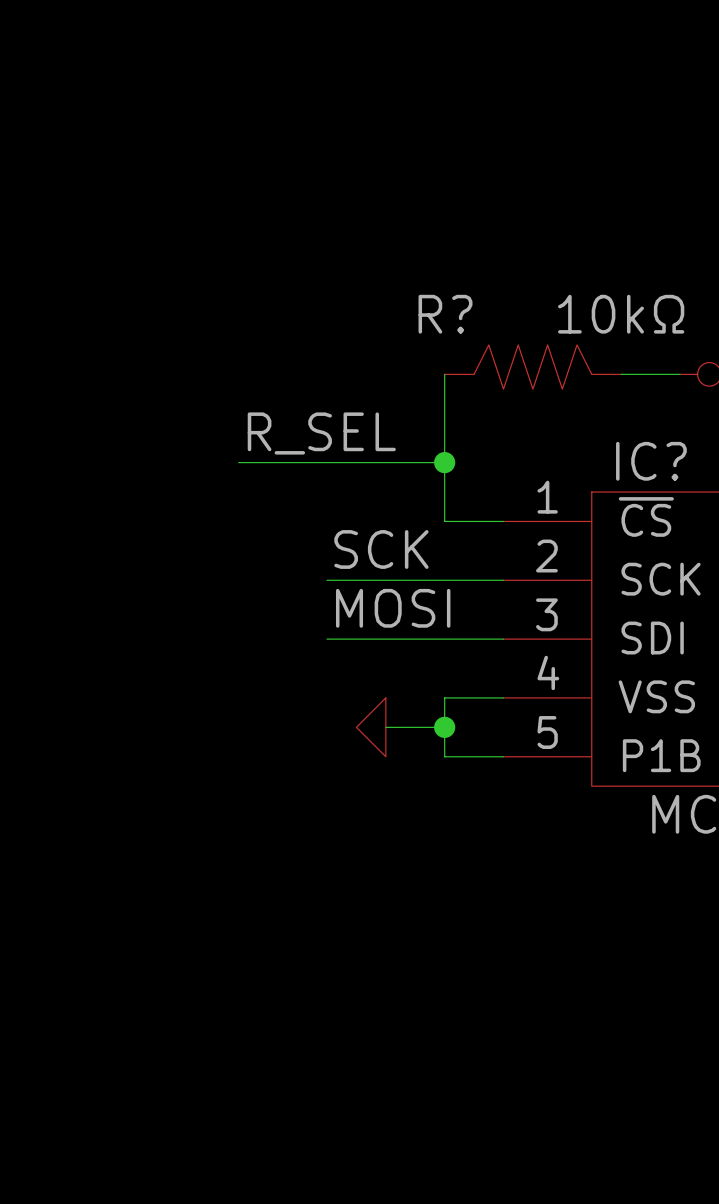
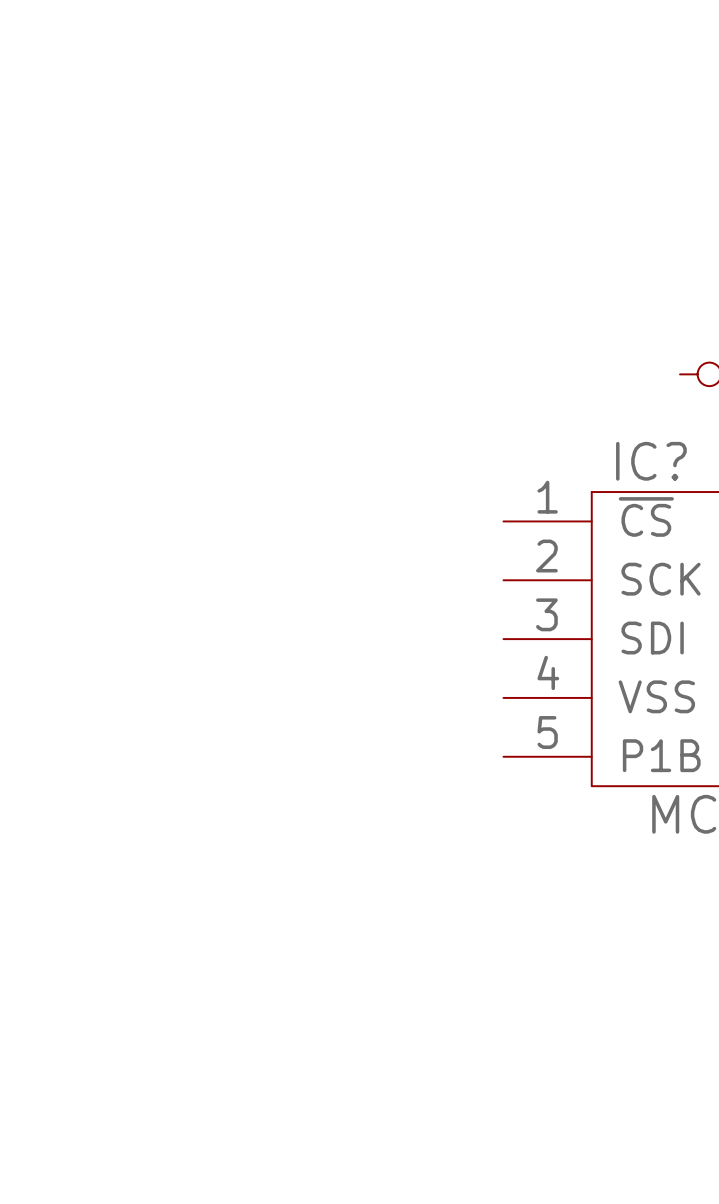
R?: 10kΩ (532, 367) -> none
wire: (444, 374) (444, 521) (503, 521) -> none
wire: (621, 374) (680, 374) -> none
label: R_SEL (321, 433) -> none
wire: (238, 462) (444, 462) -> none
junction: (444, 462) -> none
label: SCK (381, 549) -> none
wire: (327, 580) (503, 580) -> none
label: MOSI (393, 608) -> none
wire: (327, 639) (503, 639) -> none
wire: (503, 697) (444, 697) (444, 756) (503, 756) -> none
power symbol: (371, 727) -> none
wire: (385, 727) (444, 727) -> none
junction: (444, 727) -> none

